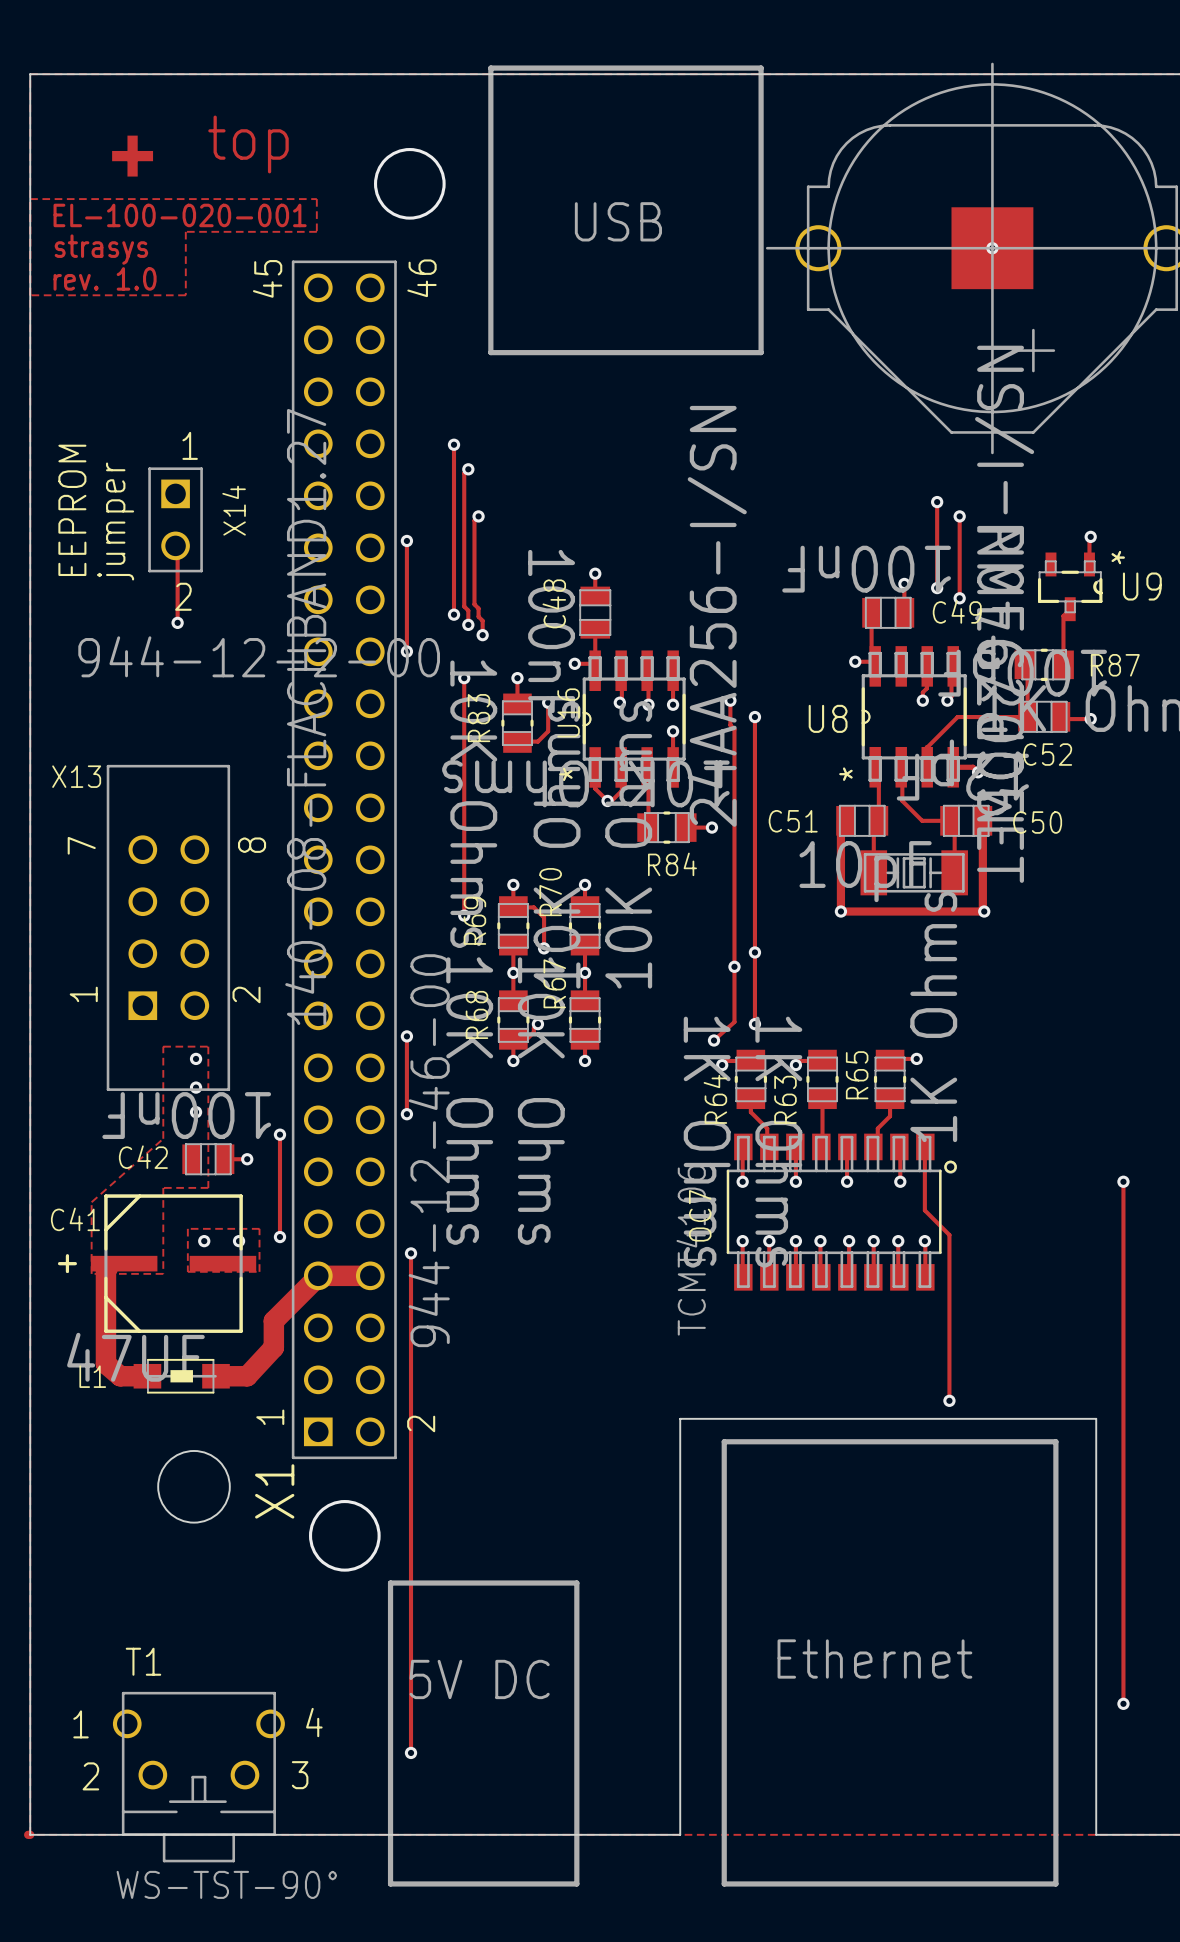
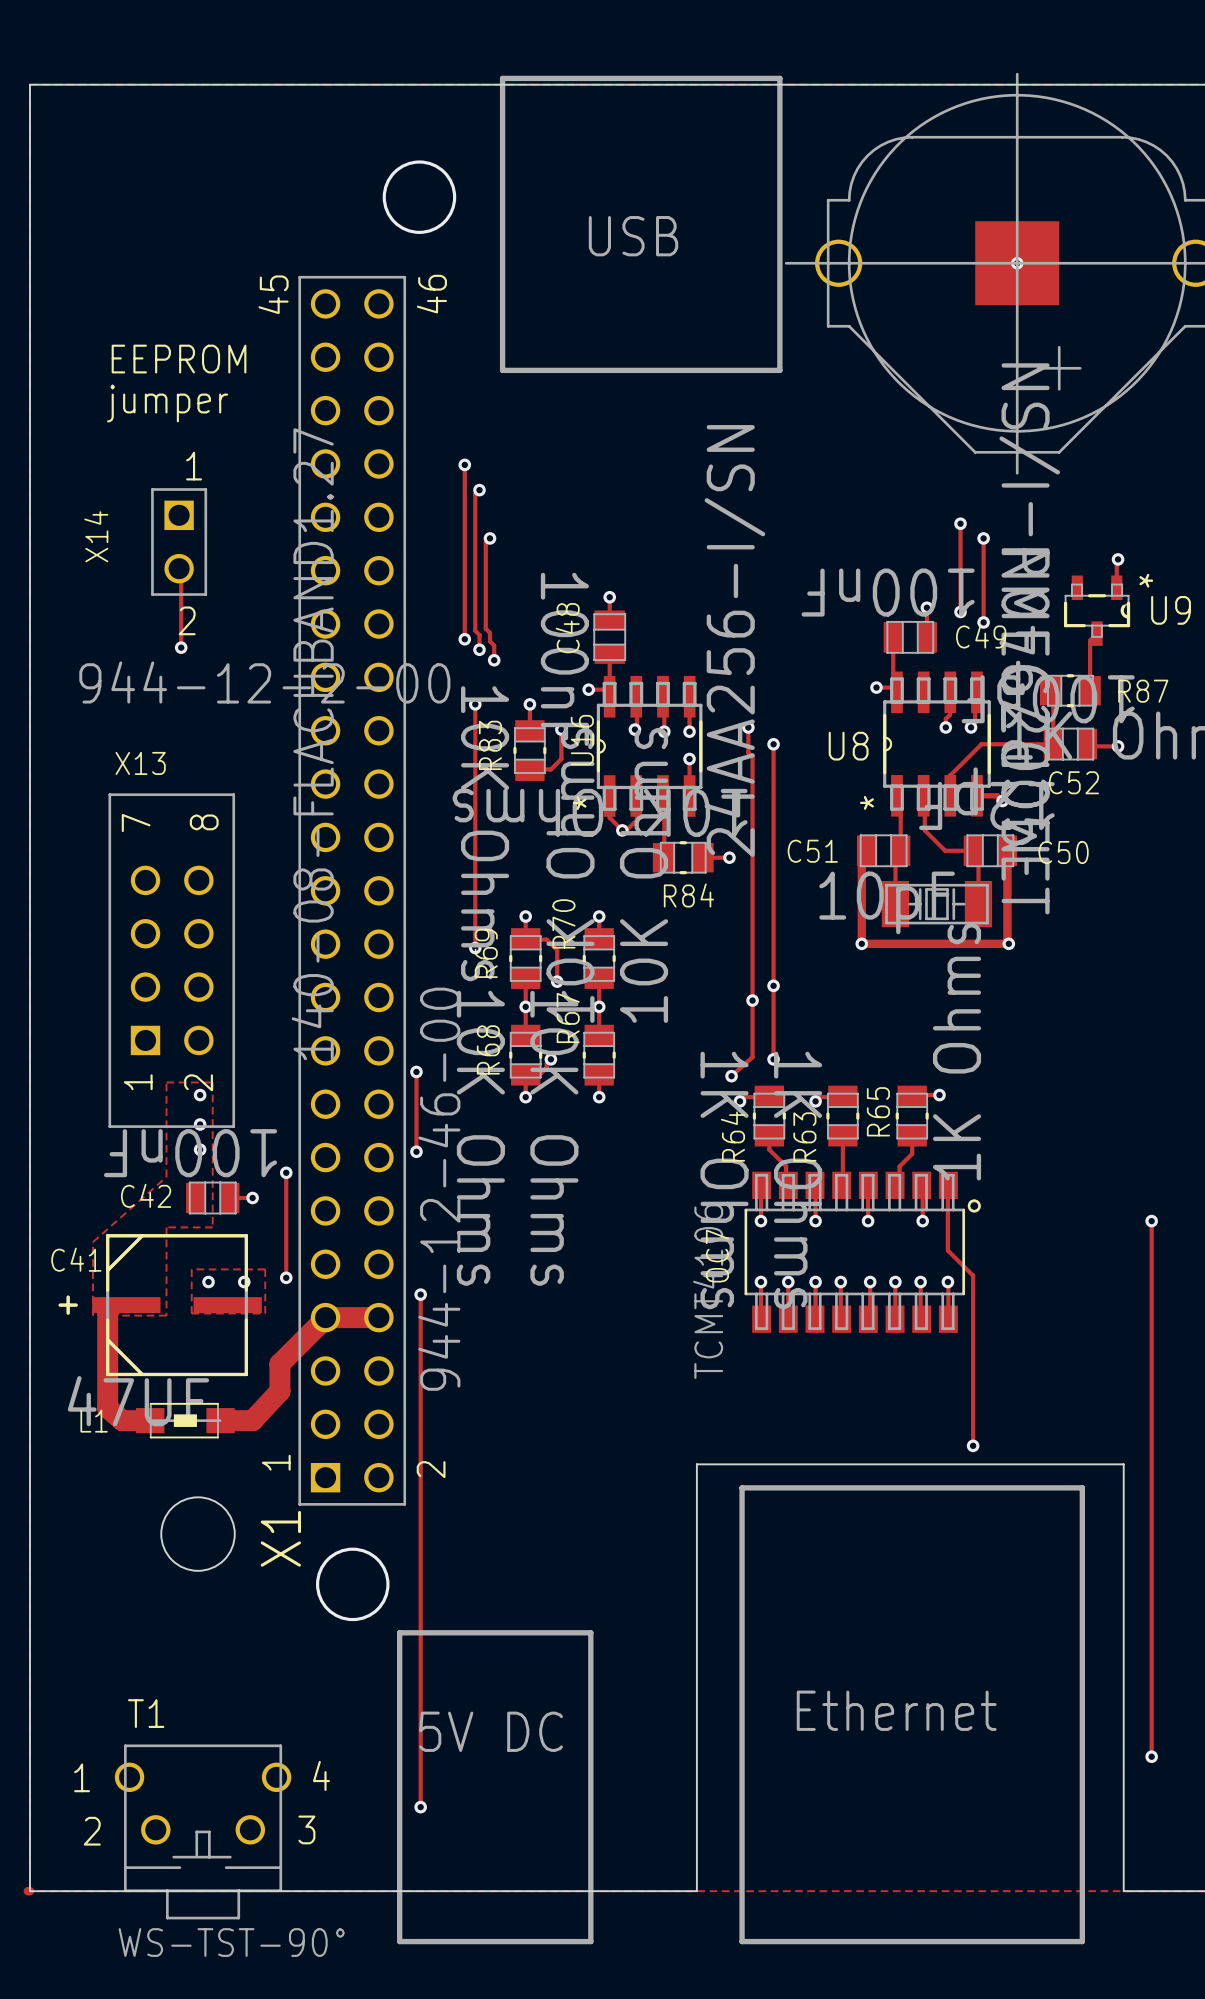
drawing: [112, 135, 154, 177] -> none
text: top (248, 144) -> none
zone outline: (30, 199) (316, 199) (316, 231) (185, 231) (185, 295) (30, 295) -> none
text: EL-100-020-001 (180, 215) -> none
text: strasys (101, 249) -> none
text: rev. 1.0 (105, 278) -> none
text rotation: 0° (72, 510) -> 90° clockwise (179, 359)
text position: EEPROM (72, 510) -> EEPROM (179, 359)
X14 name position: X14 (234, 510) -> X14 (96, 536)
text rotation: 0° (115, 521) -> 90° clockwise (167, 403)
track: (406, 540) (406, 651) -> none
via: (406, 540) -> none
via: (406, 651) -> none
X13 name position: X13 (76, 776) -> X13 (140, 763)
X13 text position: 7 (81, 845) -> 7 (136, 823)
X13 text position: 8 (252, 845) -> 8 (204, 822)
X13 text position: 1 (83, 994) -> 1 (138, 1082)
X13 text position: 2 (246, 994) -> 2 (198, 1082)

